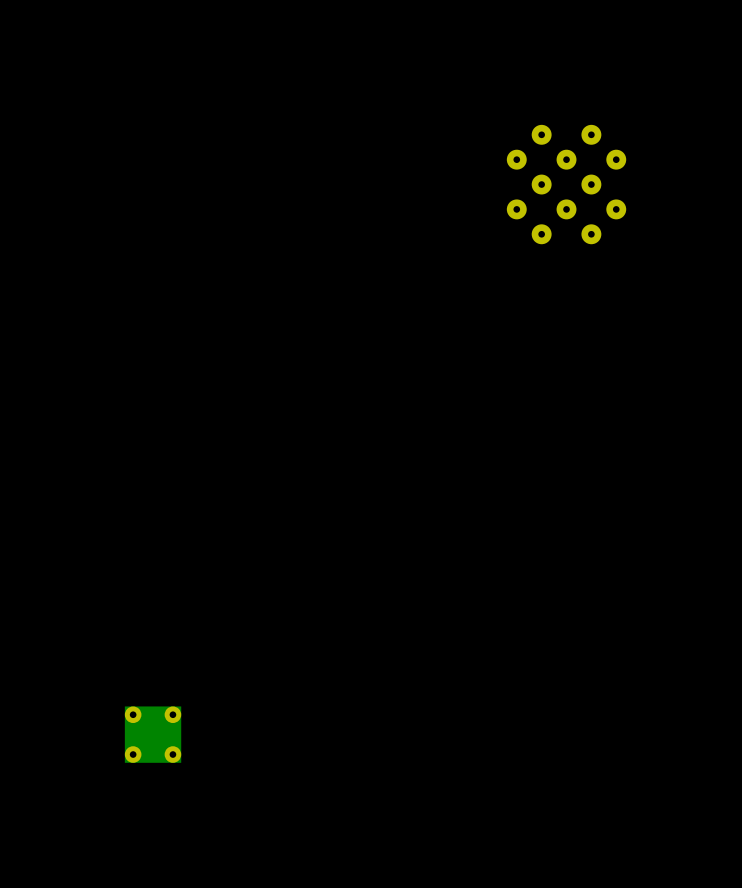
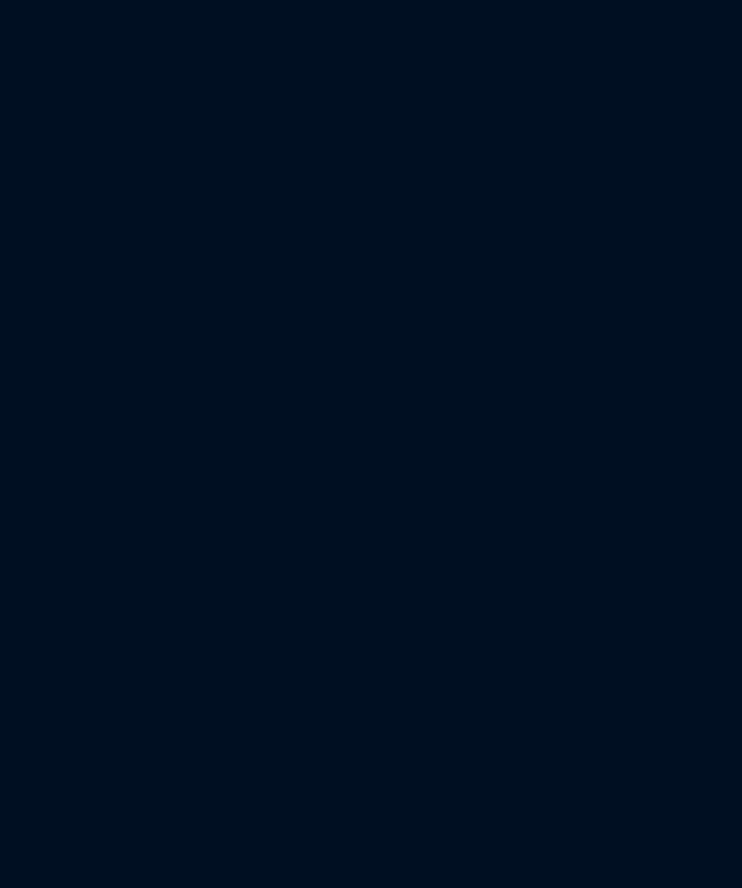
part: (566, 184) -> none
part: (153, 734) -> none

